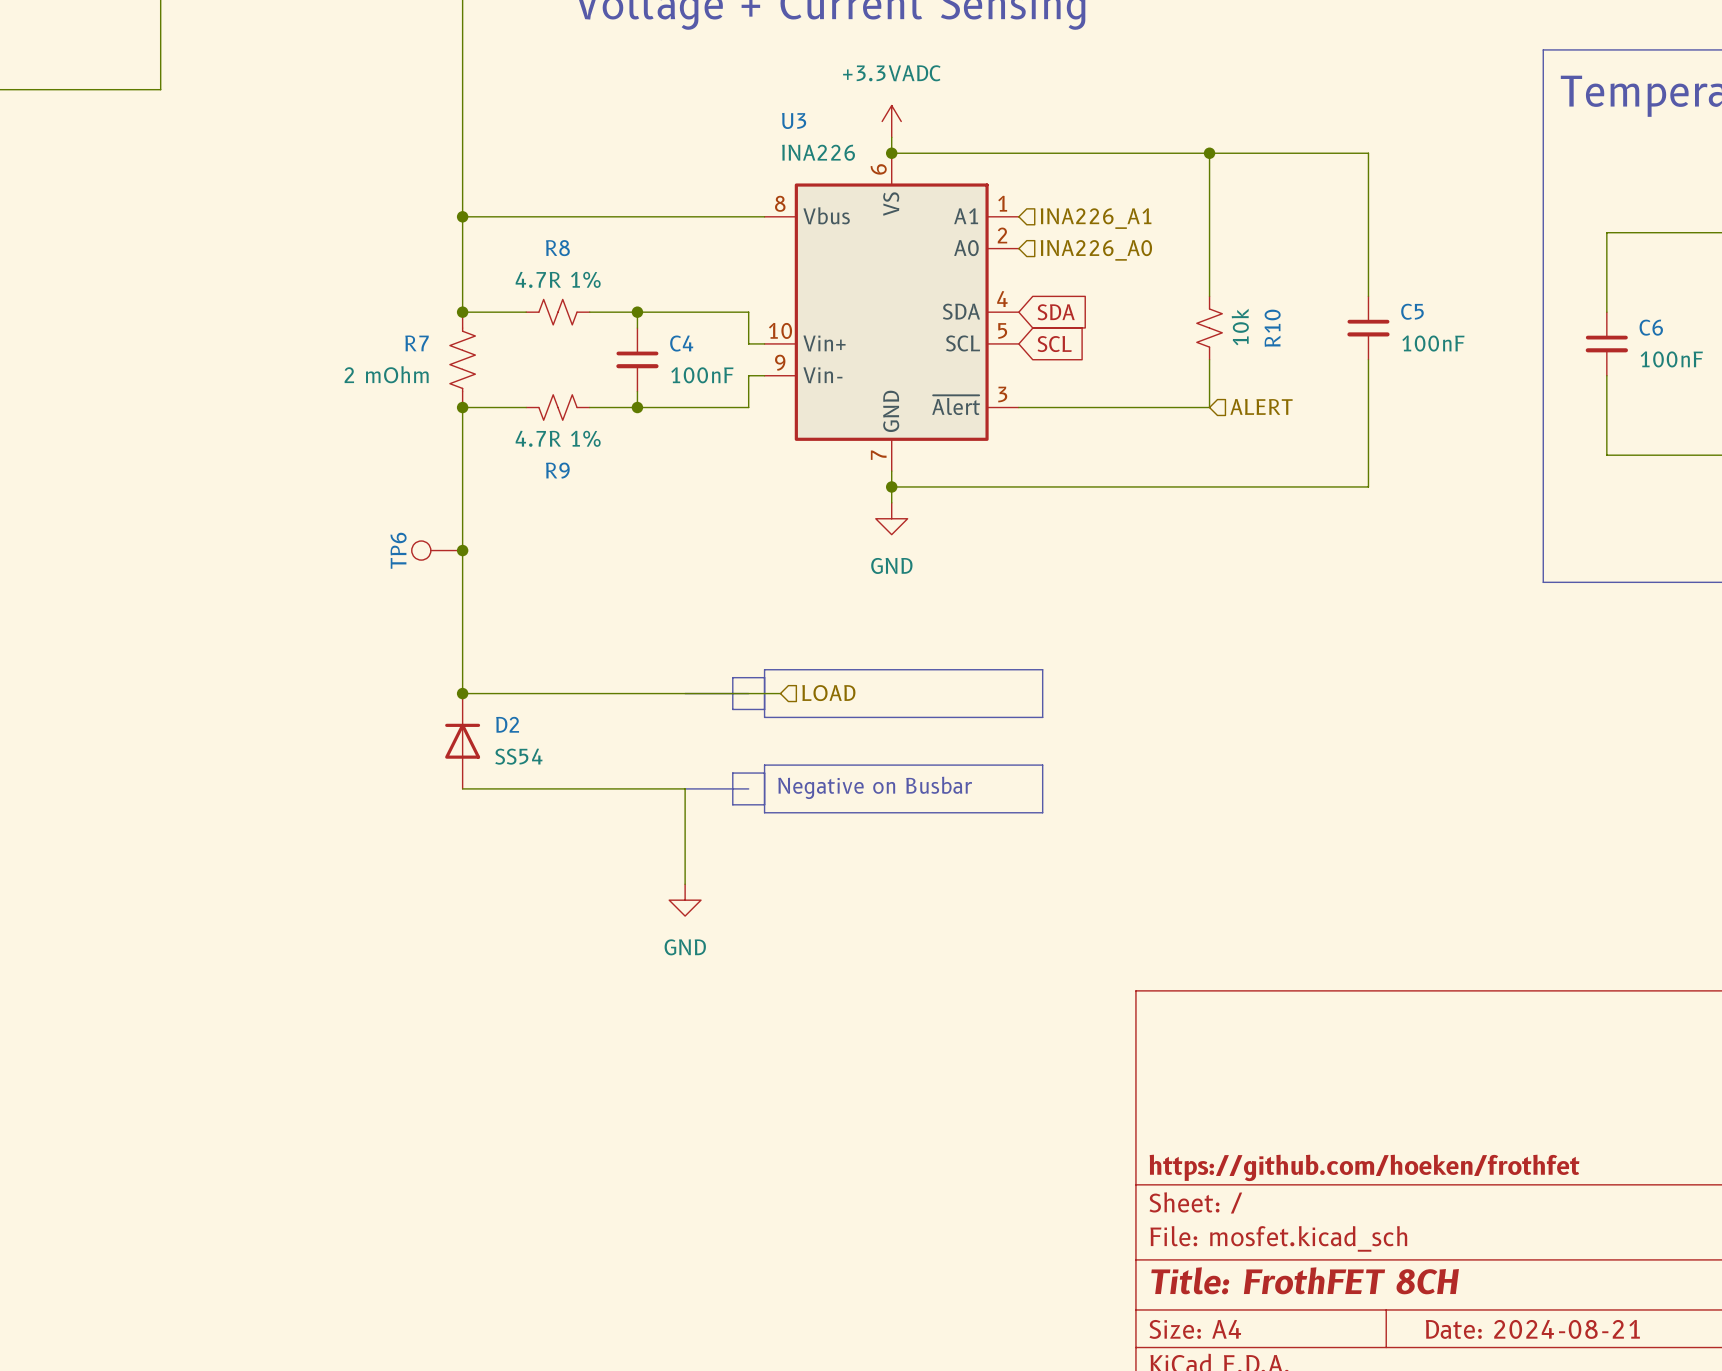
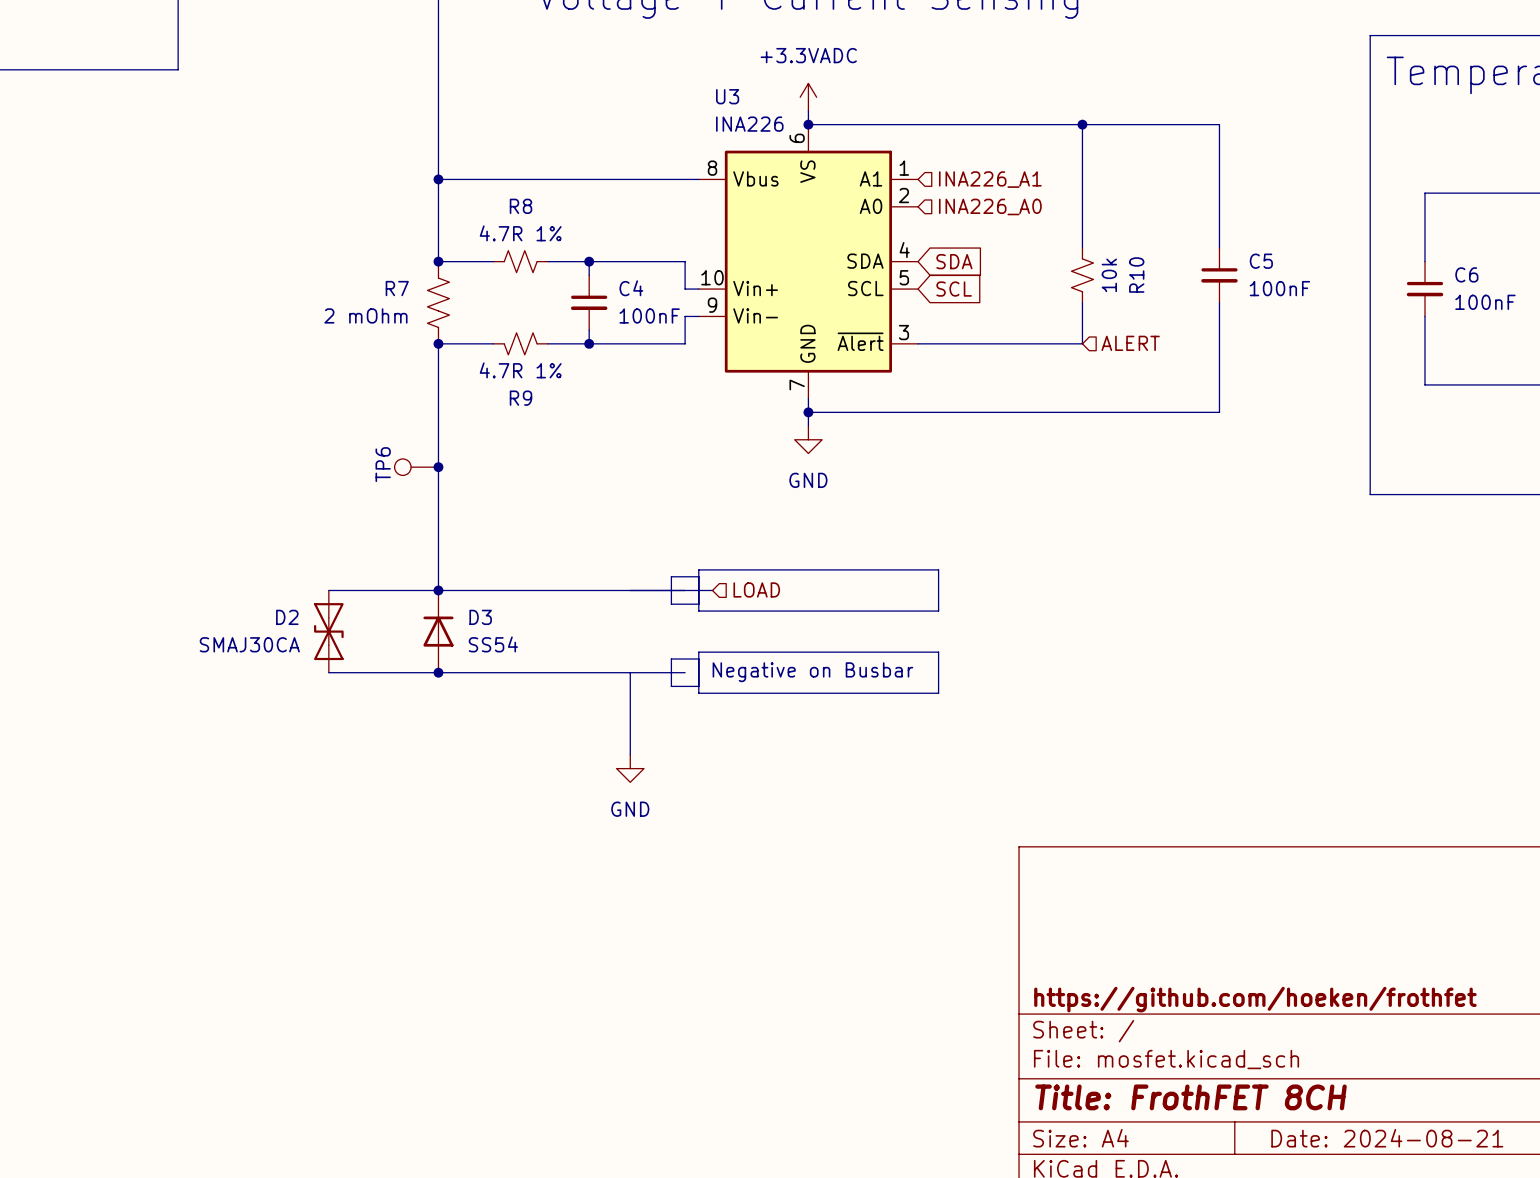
wire: none -> (328, 590) (438, 590)
D2 name: D2 (507, 724) -> D3 (480, 617)
D2: none -> SMAJ30CA (328, 631)
wire: none -> (328, 672) (438, 672)
junction: none -> (438, 672)

